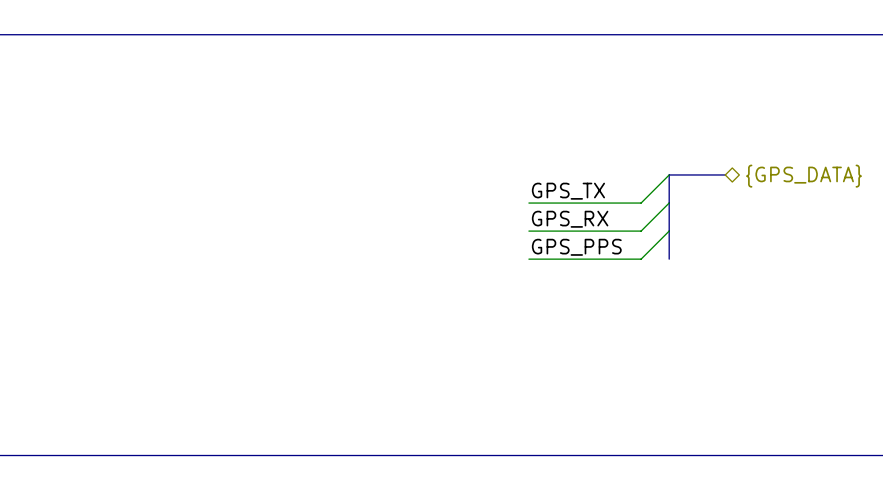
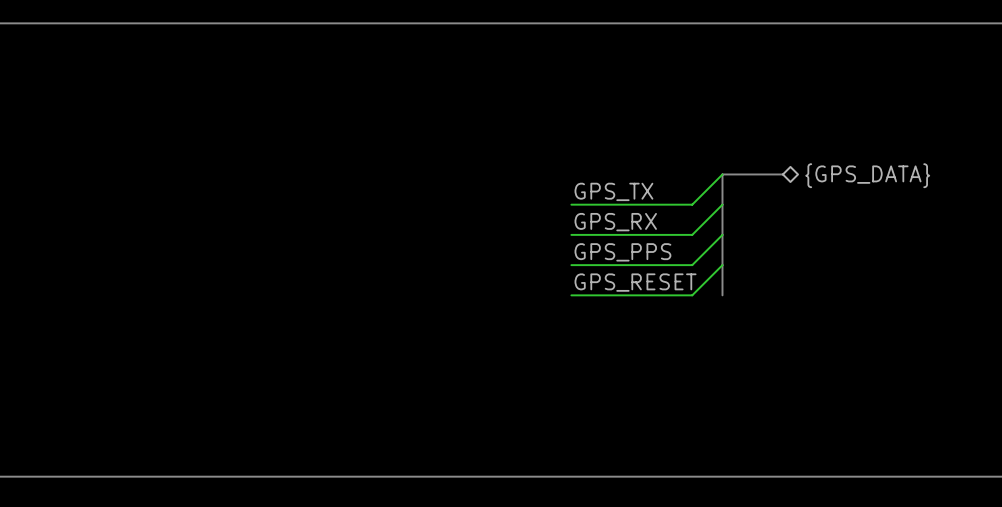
wire: none -> (722, 265) (692, 295) (571, 295)
bus: none -> (722, 265) (722, 295)
label: none -> GPS_RESET (635, 282)

